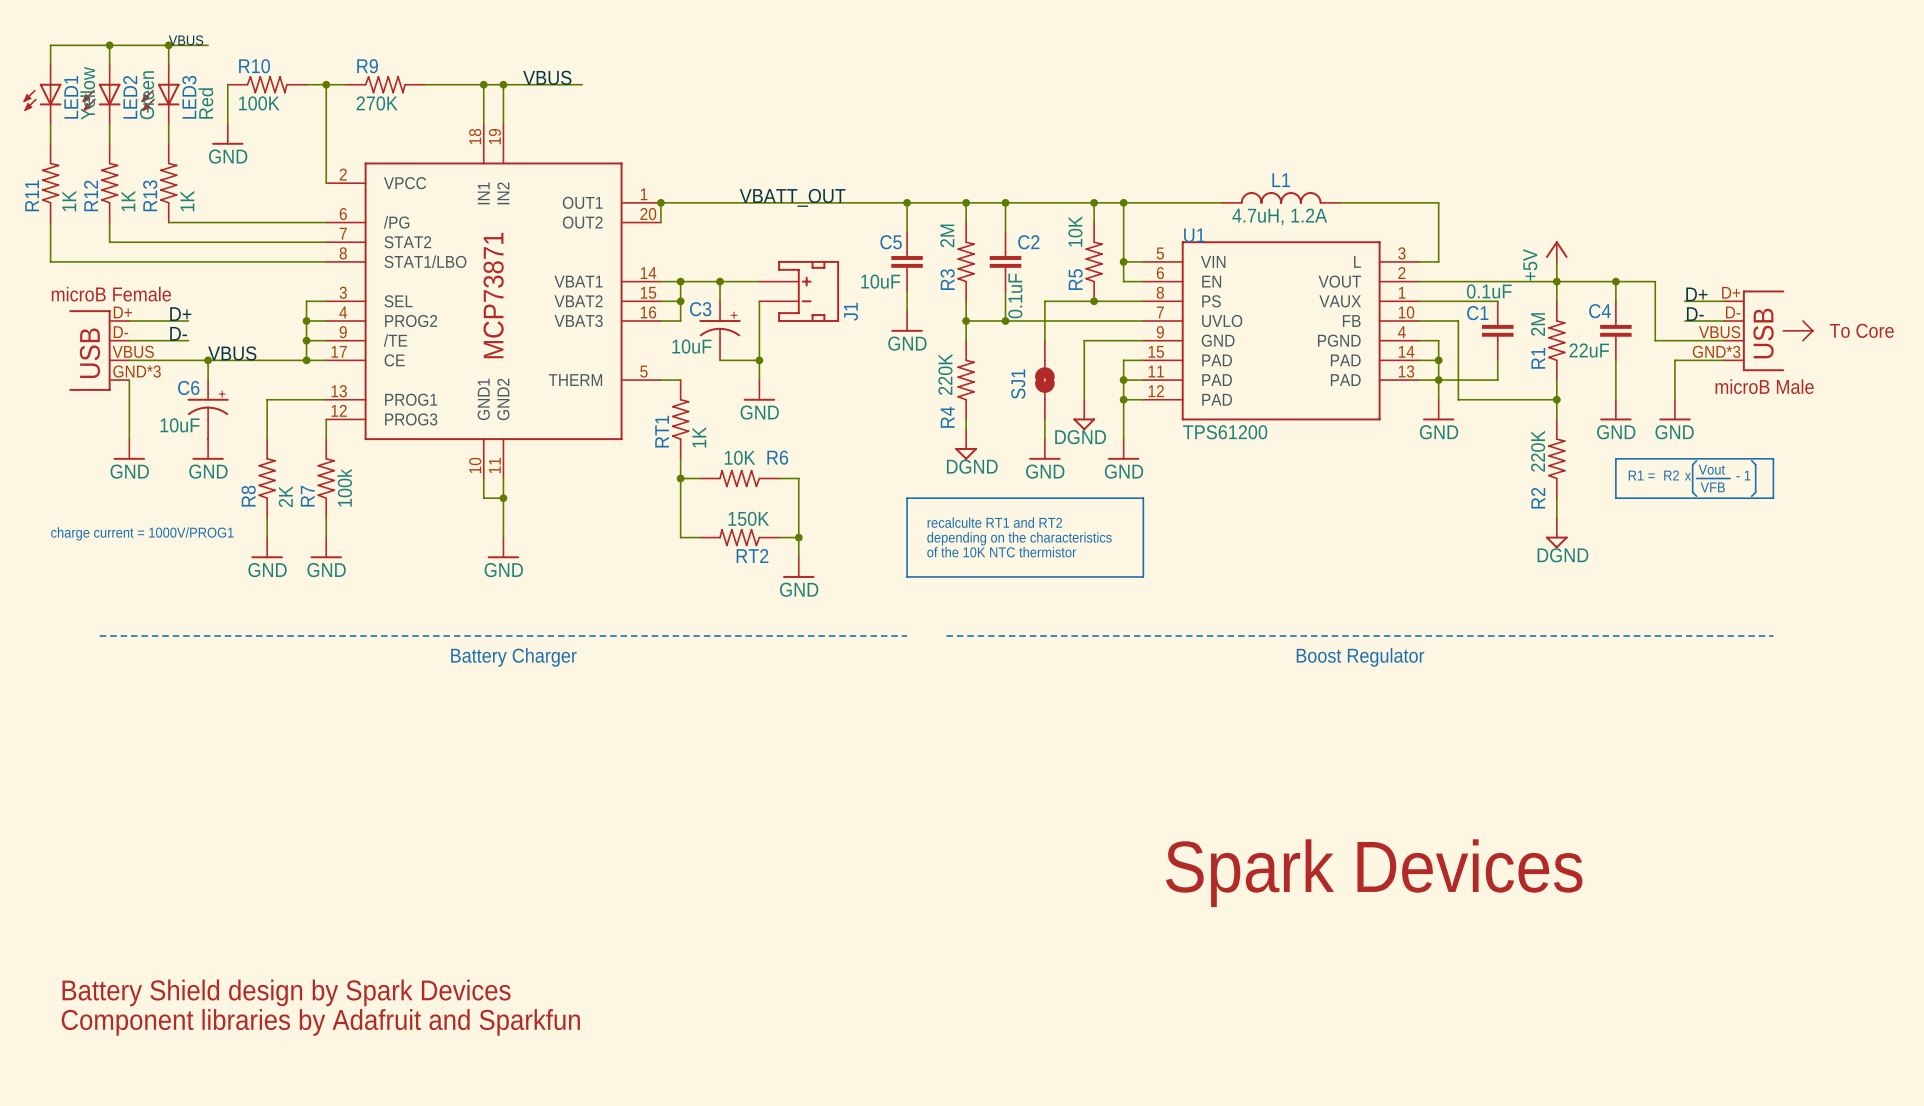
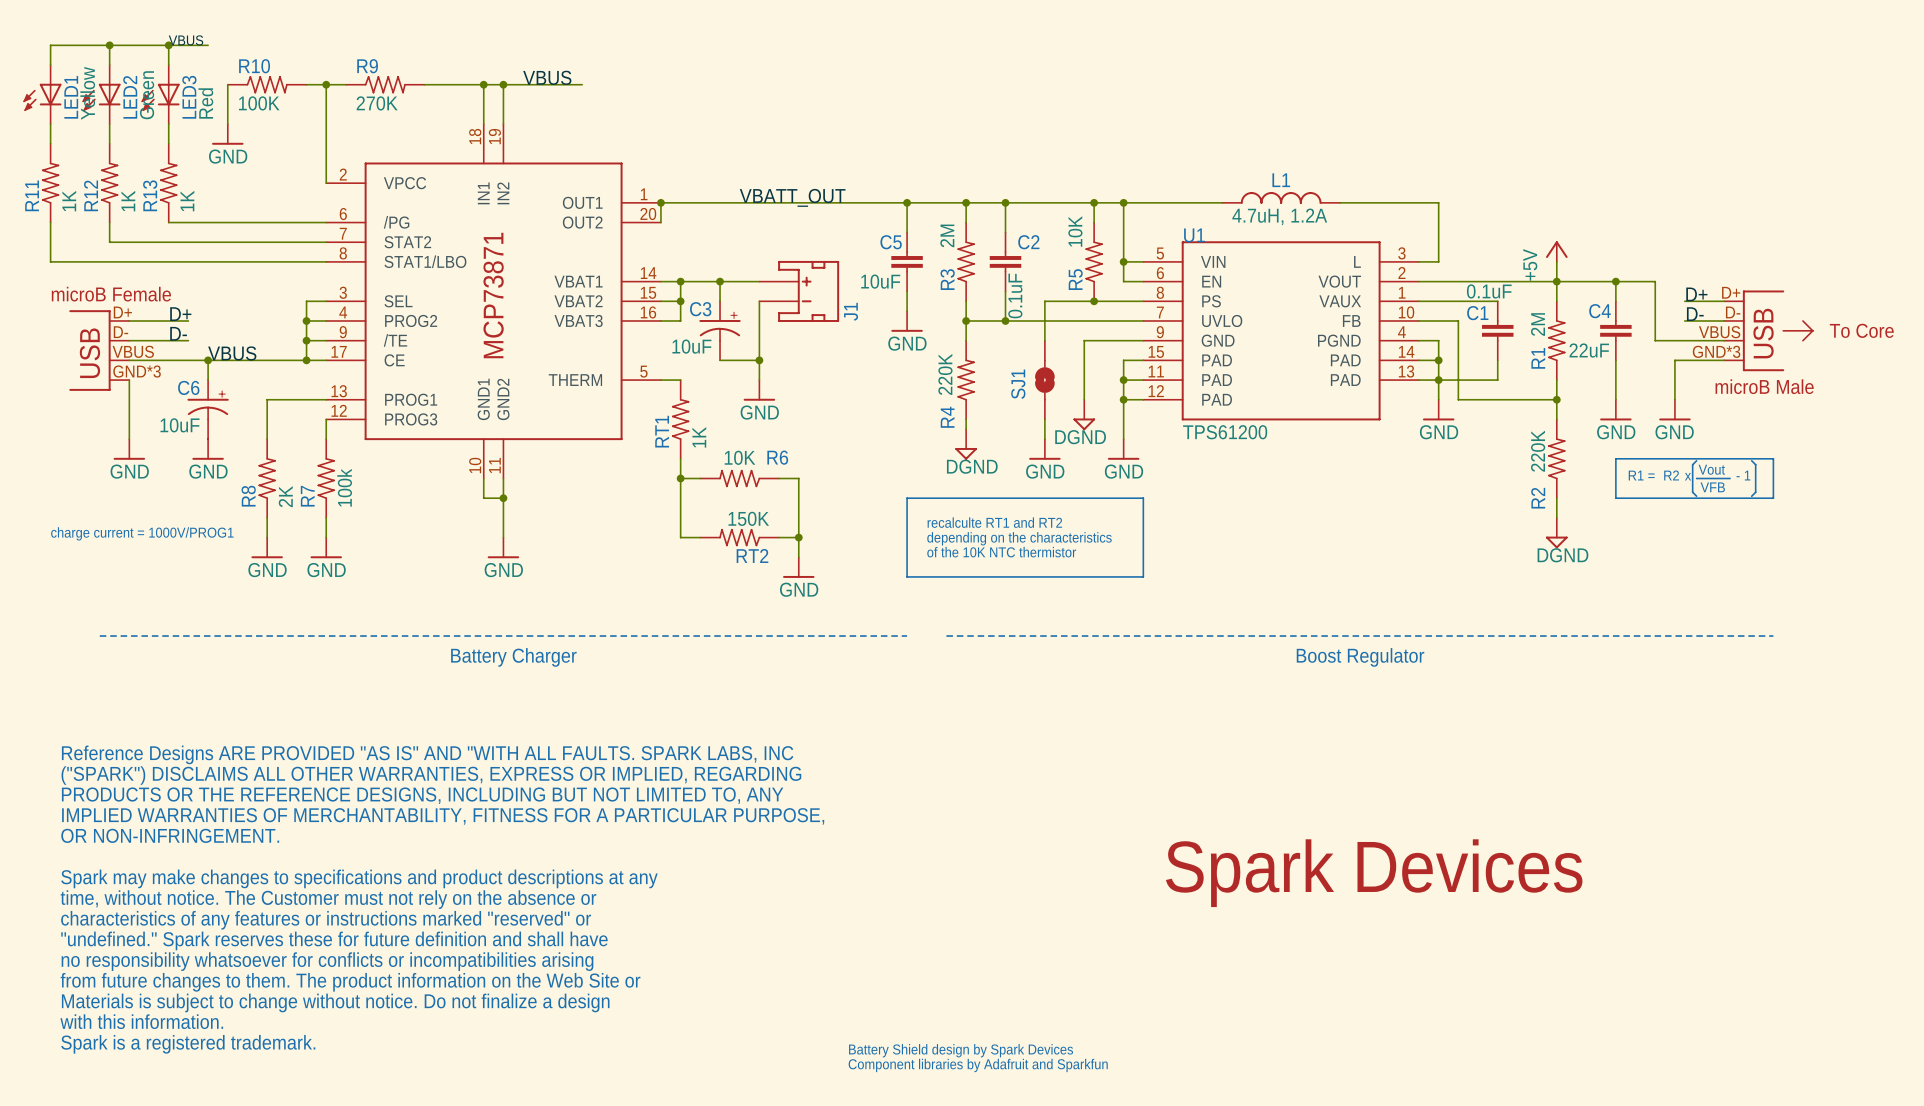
text: none -> Reference Designs ARE PROVIDED "AS IS" AND "WITH ALL FAULTS. SPARK LABS, INC (427, 754)
text: none -> ("SPARK") DISCLAIMS ALL OTHER WARRANTIES, EXPRESS OR IMPLIED, REGARDING (431, 775)
text: none -> PRODUCTS OR THE REFERENCE DESIGNS, INCLUDING BUT NOT LIMITED TO, ANY (422, 795)
text: none -> IMPLIED WARRANTIES OF MERCHANTABILITY, FITNESS FOR A PARTICULAR PURPOSE, (443, 816)
text: none -> OR NON-INFRINGEMENT. (170, 835)
text: none -> Spark may make changes to specifications and product descriptions at any (359, 878)
text: none -> time, without notice. The Customer must not rely on the absence or (328, 899)
text: none -> characteristics of any features or instructions marked "reserved" or (326, 920)
text: none -> "undefined." Spark reserves these for future definition and shall have (334, 940)
text: none -> no responsibility whatsoever for conflicts or incompatibilities arising (327, 961)
text: none -> from future changes to them. The product information on the Web Site or (350, 982)
text: Battery Shield design by Spark Devices (286, 992) -> none
text: none -> Materials is subject to change without notice. Do not finalize a design (335, 1002)
text: Component libraries by Adafruit and Sparkfun (320, 1022) -> with this information. (141, 1021)
text: none -> Spark is a registered trademark. (188, 1044)
text: none -> Battery Shield design by Spark Devices (961, 1050)
text: none -> Component libraries by Adafruit and Sparkfun (978, 1065)

